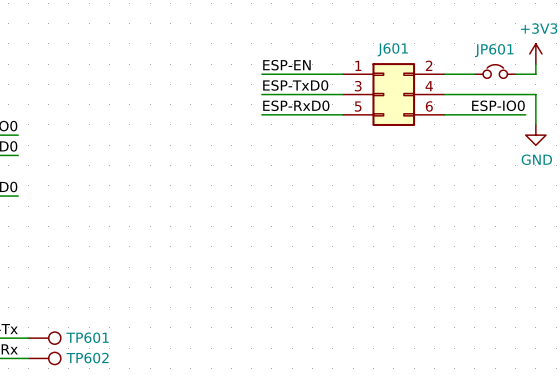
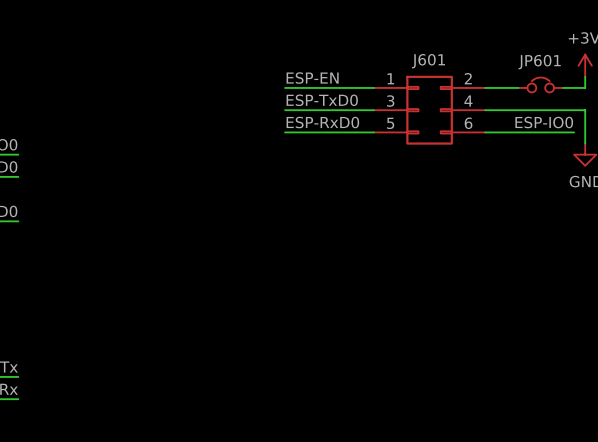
wire: (18, 338) (28, 338) -> none
TP601: (44, 338) -> none
wire: (18, 358) (28, 358) -> none
TP602: (44, 358) -> none

